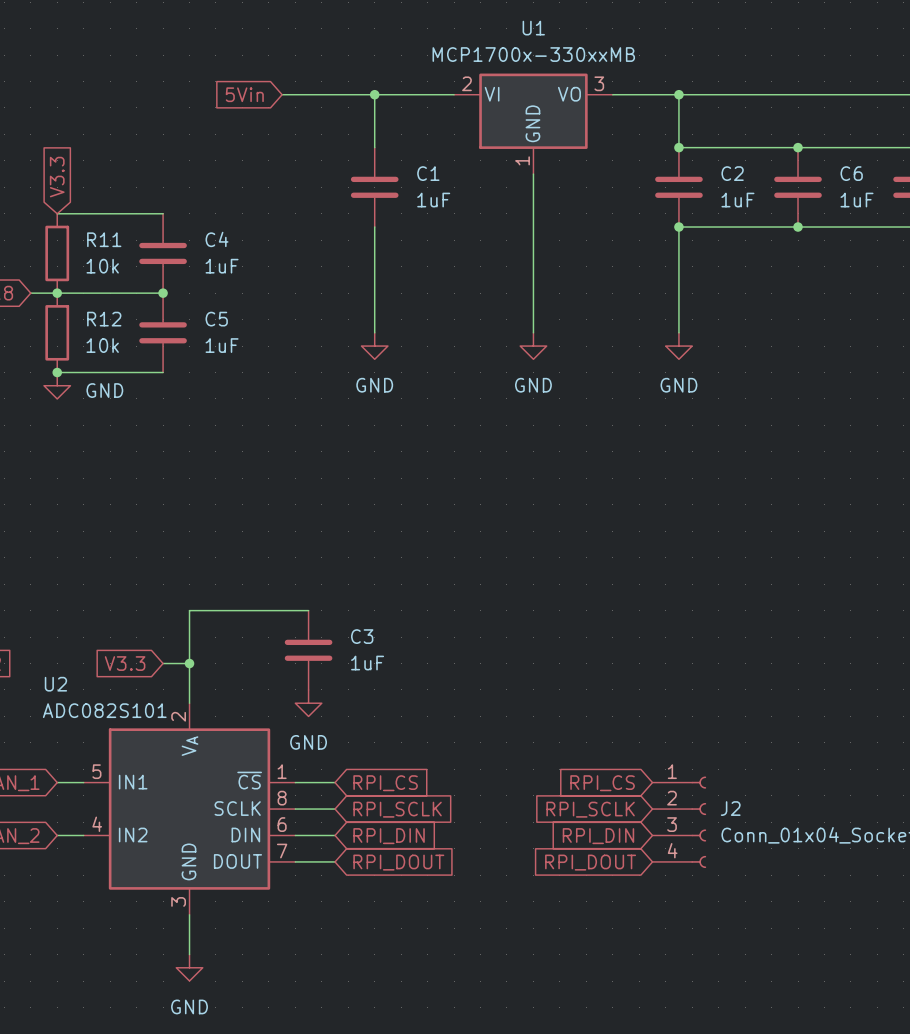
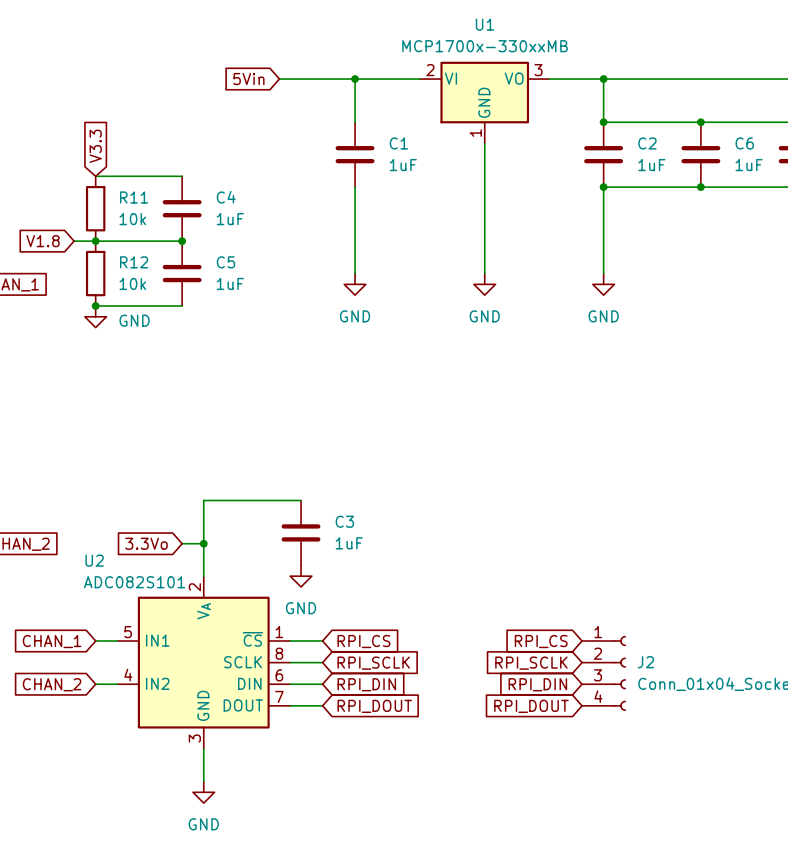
global label: V3.3 (125, 663) -> 3.3Vo (146, 543)

